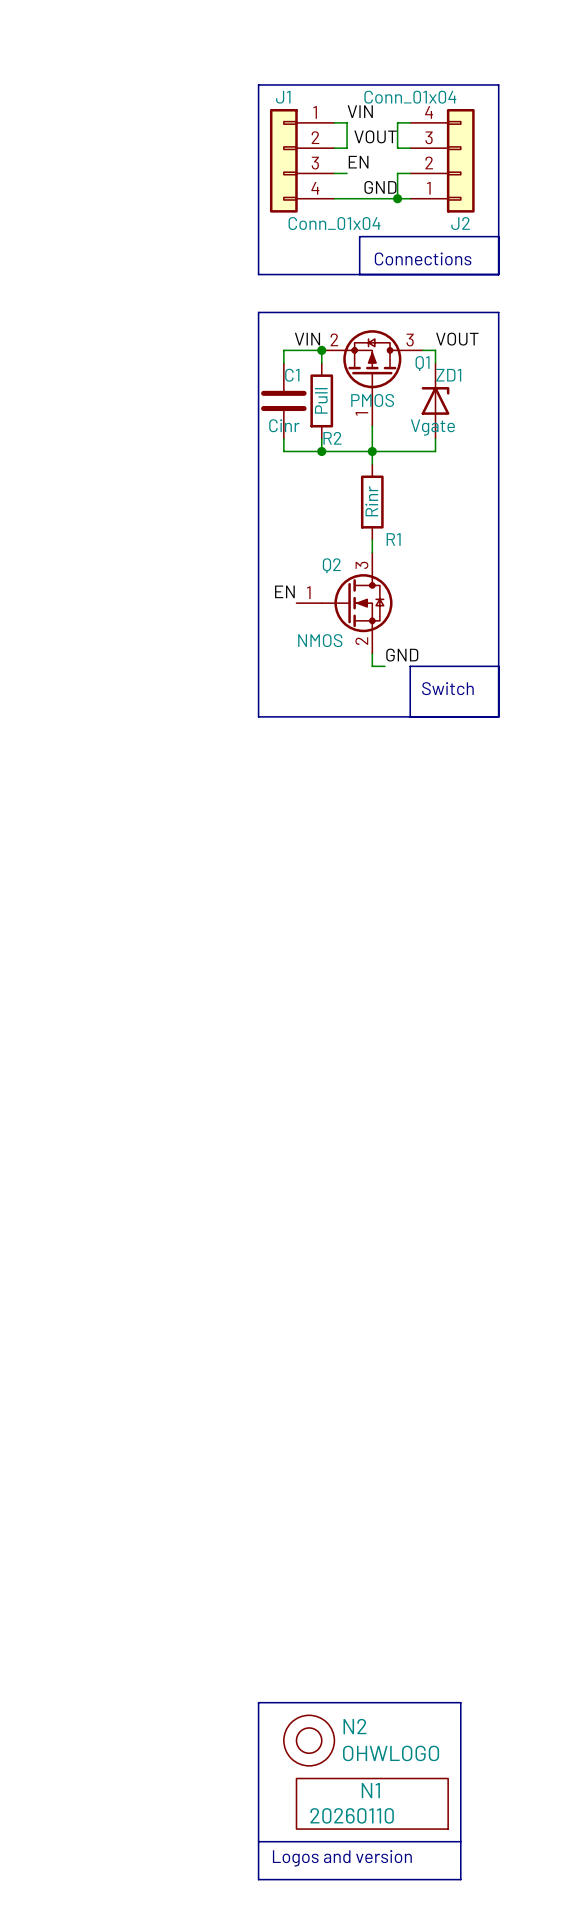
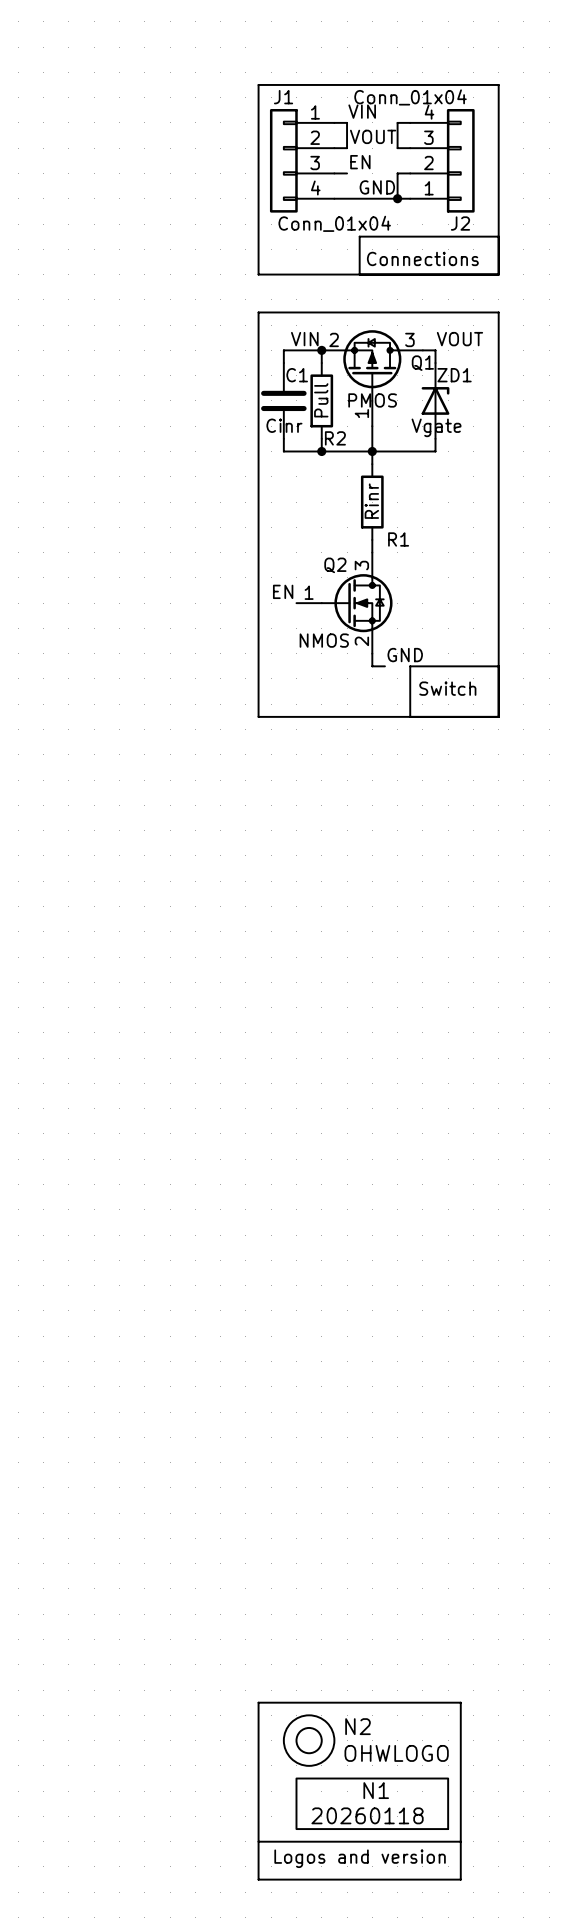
N1 value: 20260110 (352, 1815) -> 20260118 (367, 1815)

